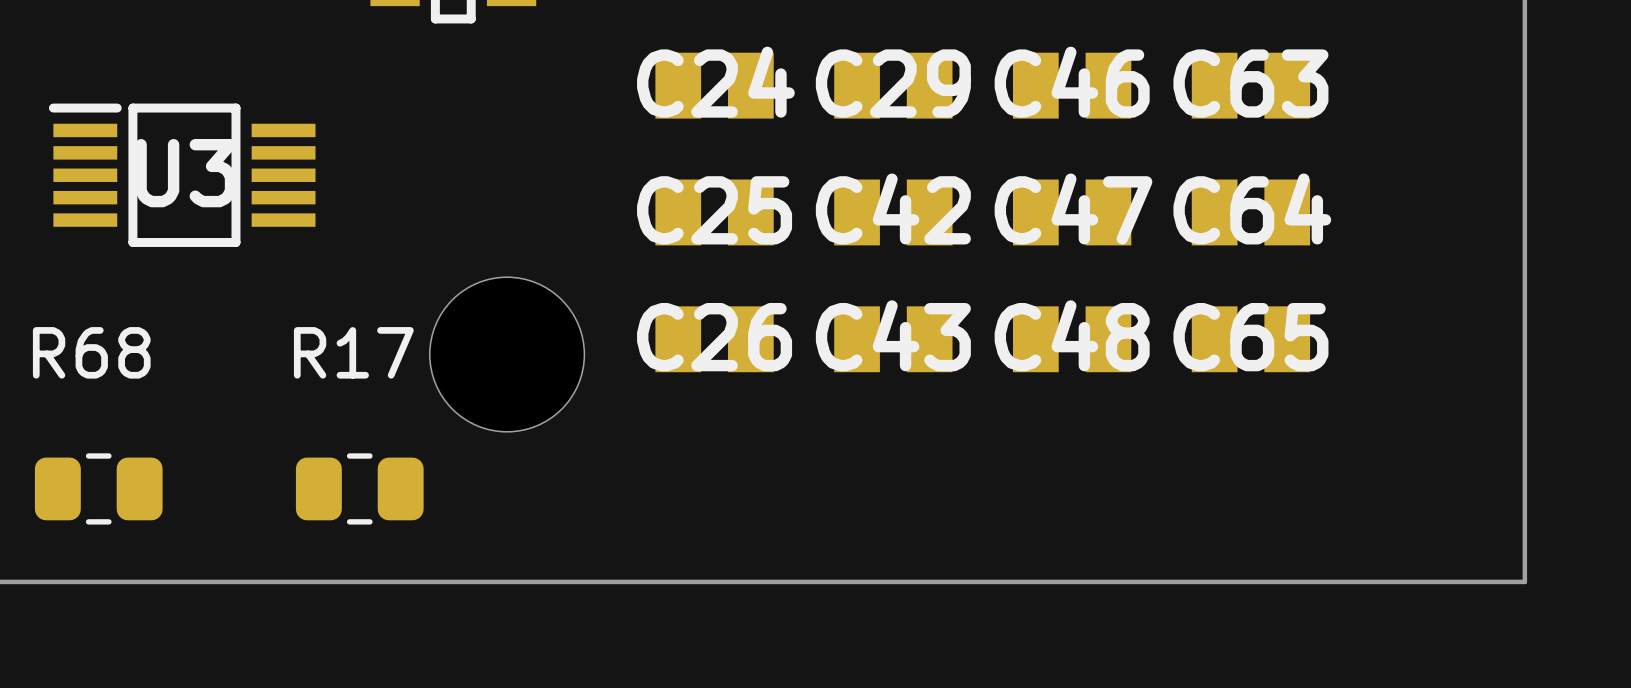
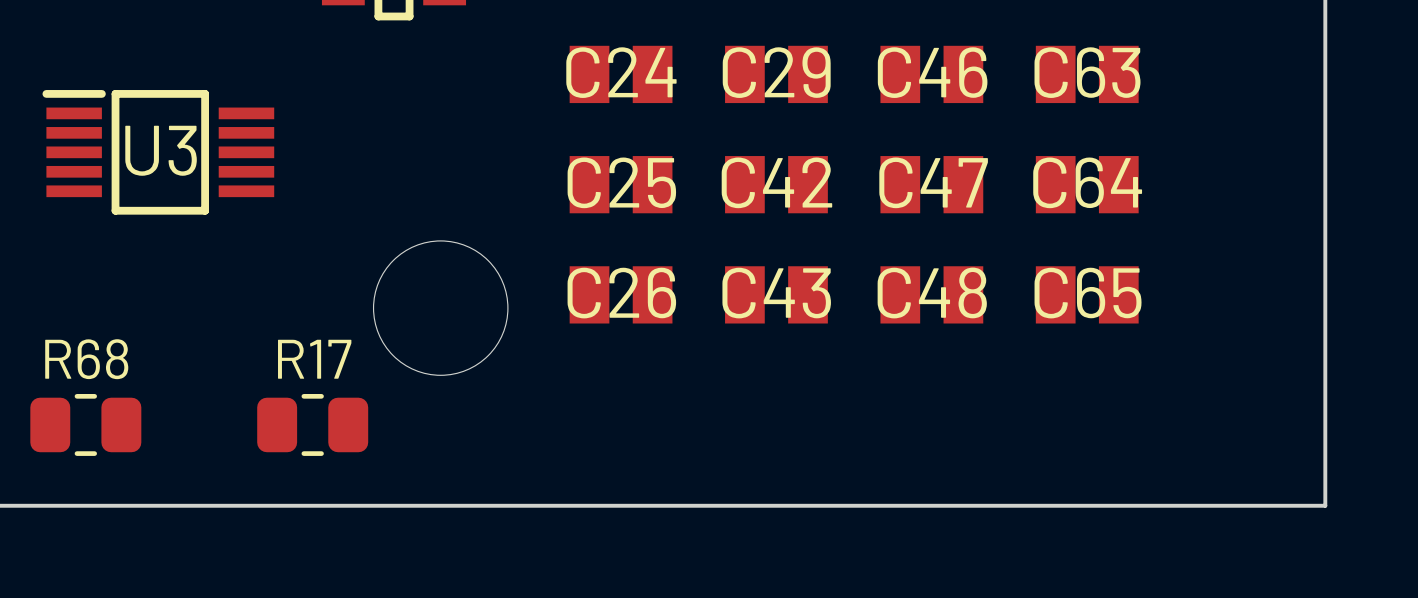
R68 name position: R68 (91, 352) -> R68 (86, 359)
R17 name position: R17 (353, 352) -> R17 (314, 359)

